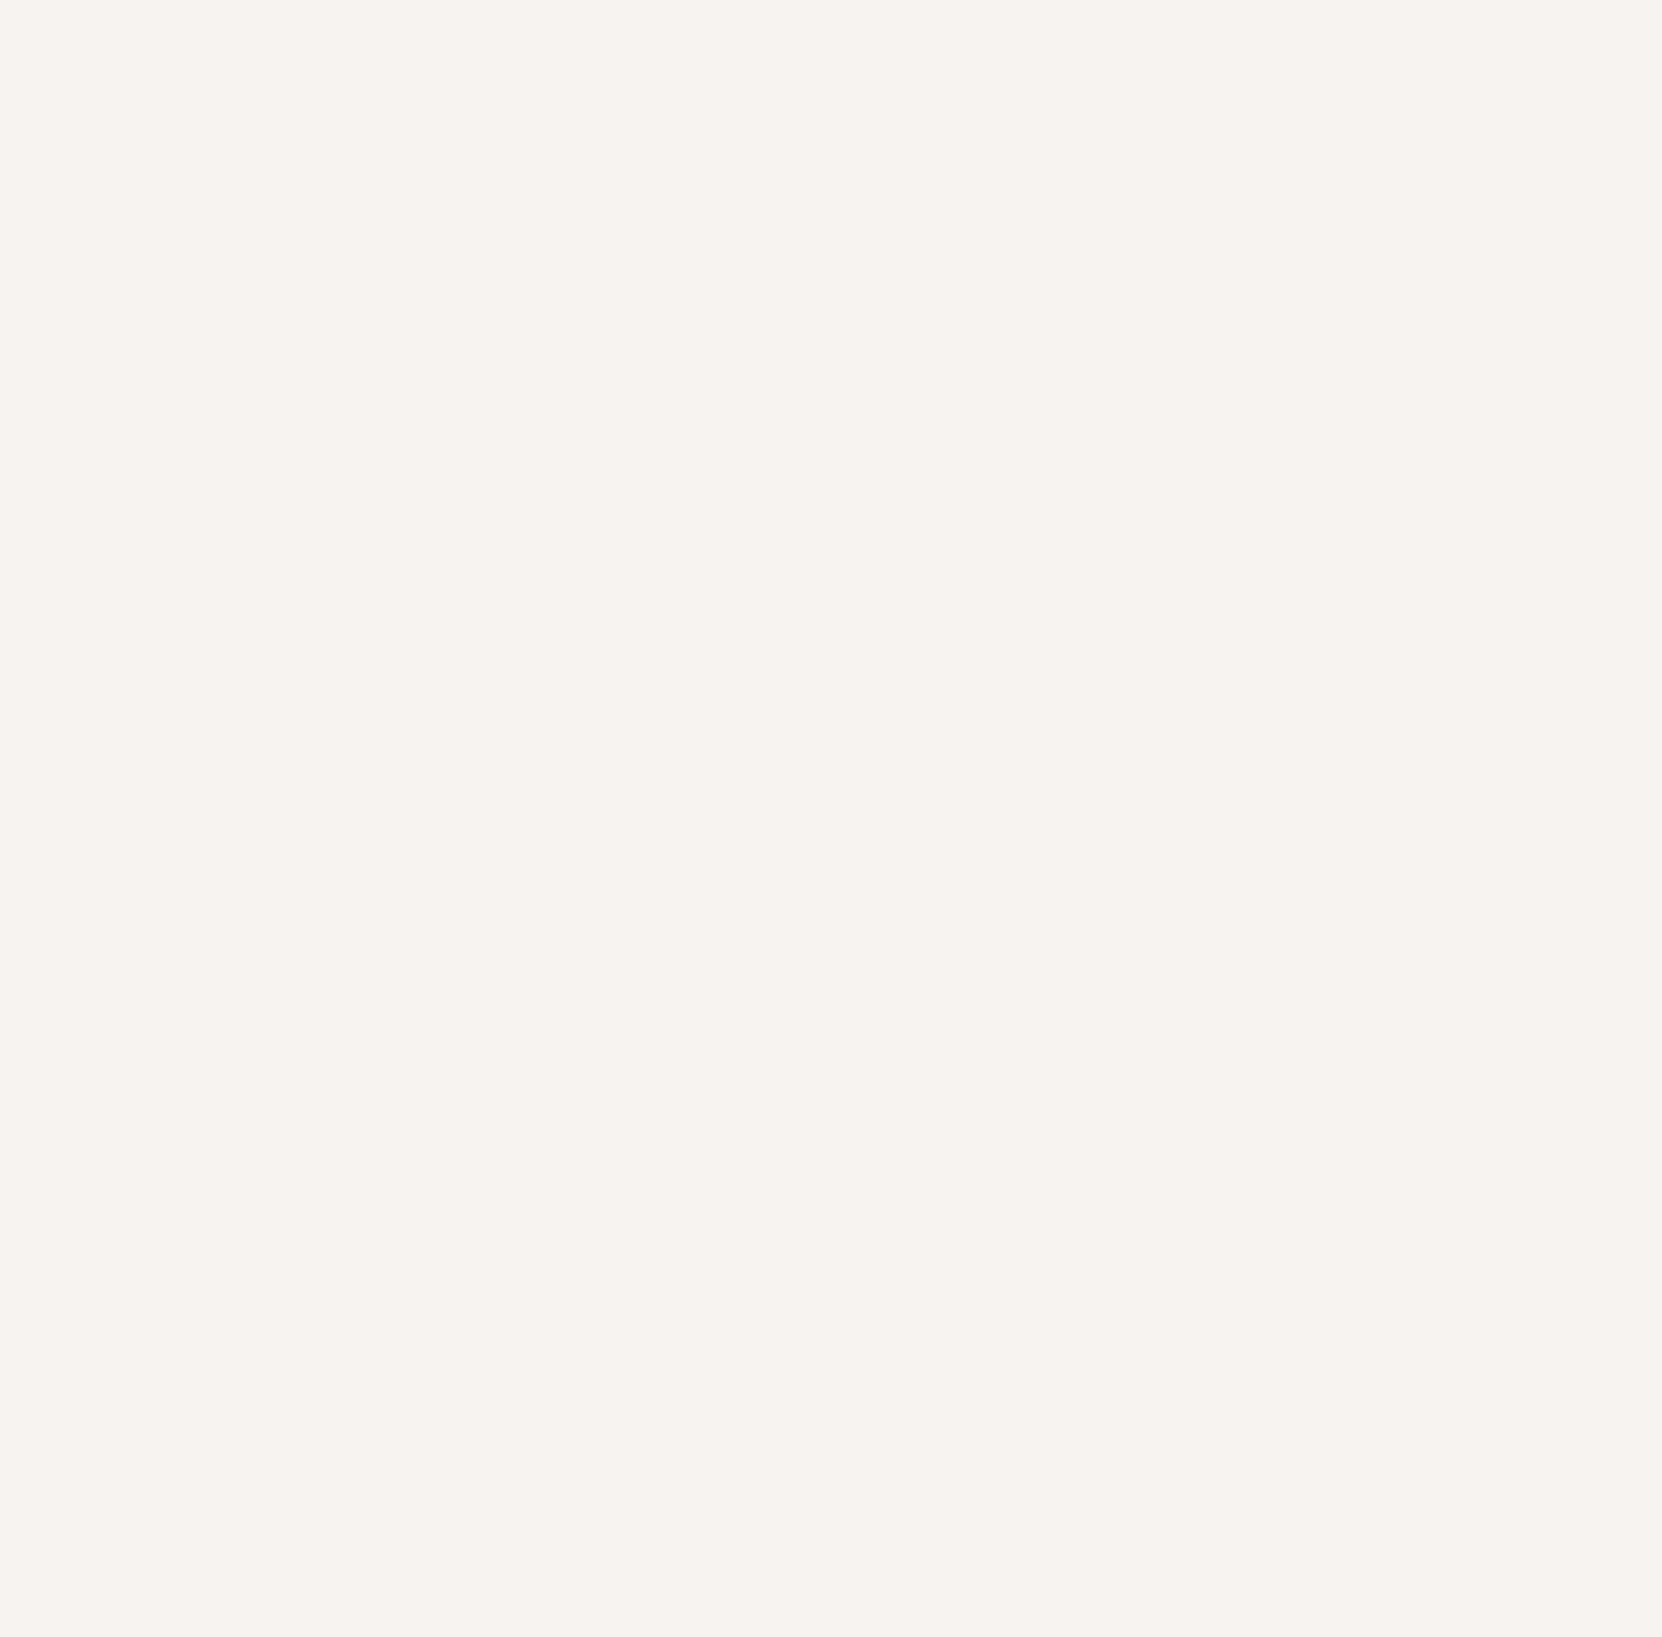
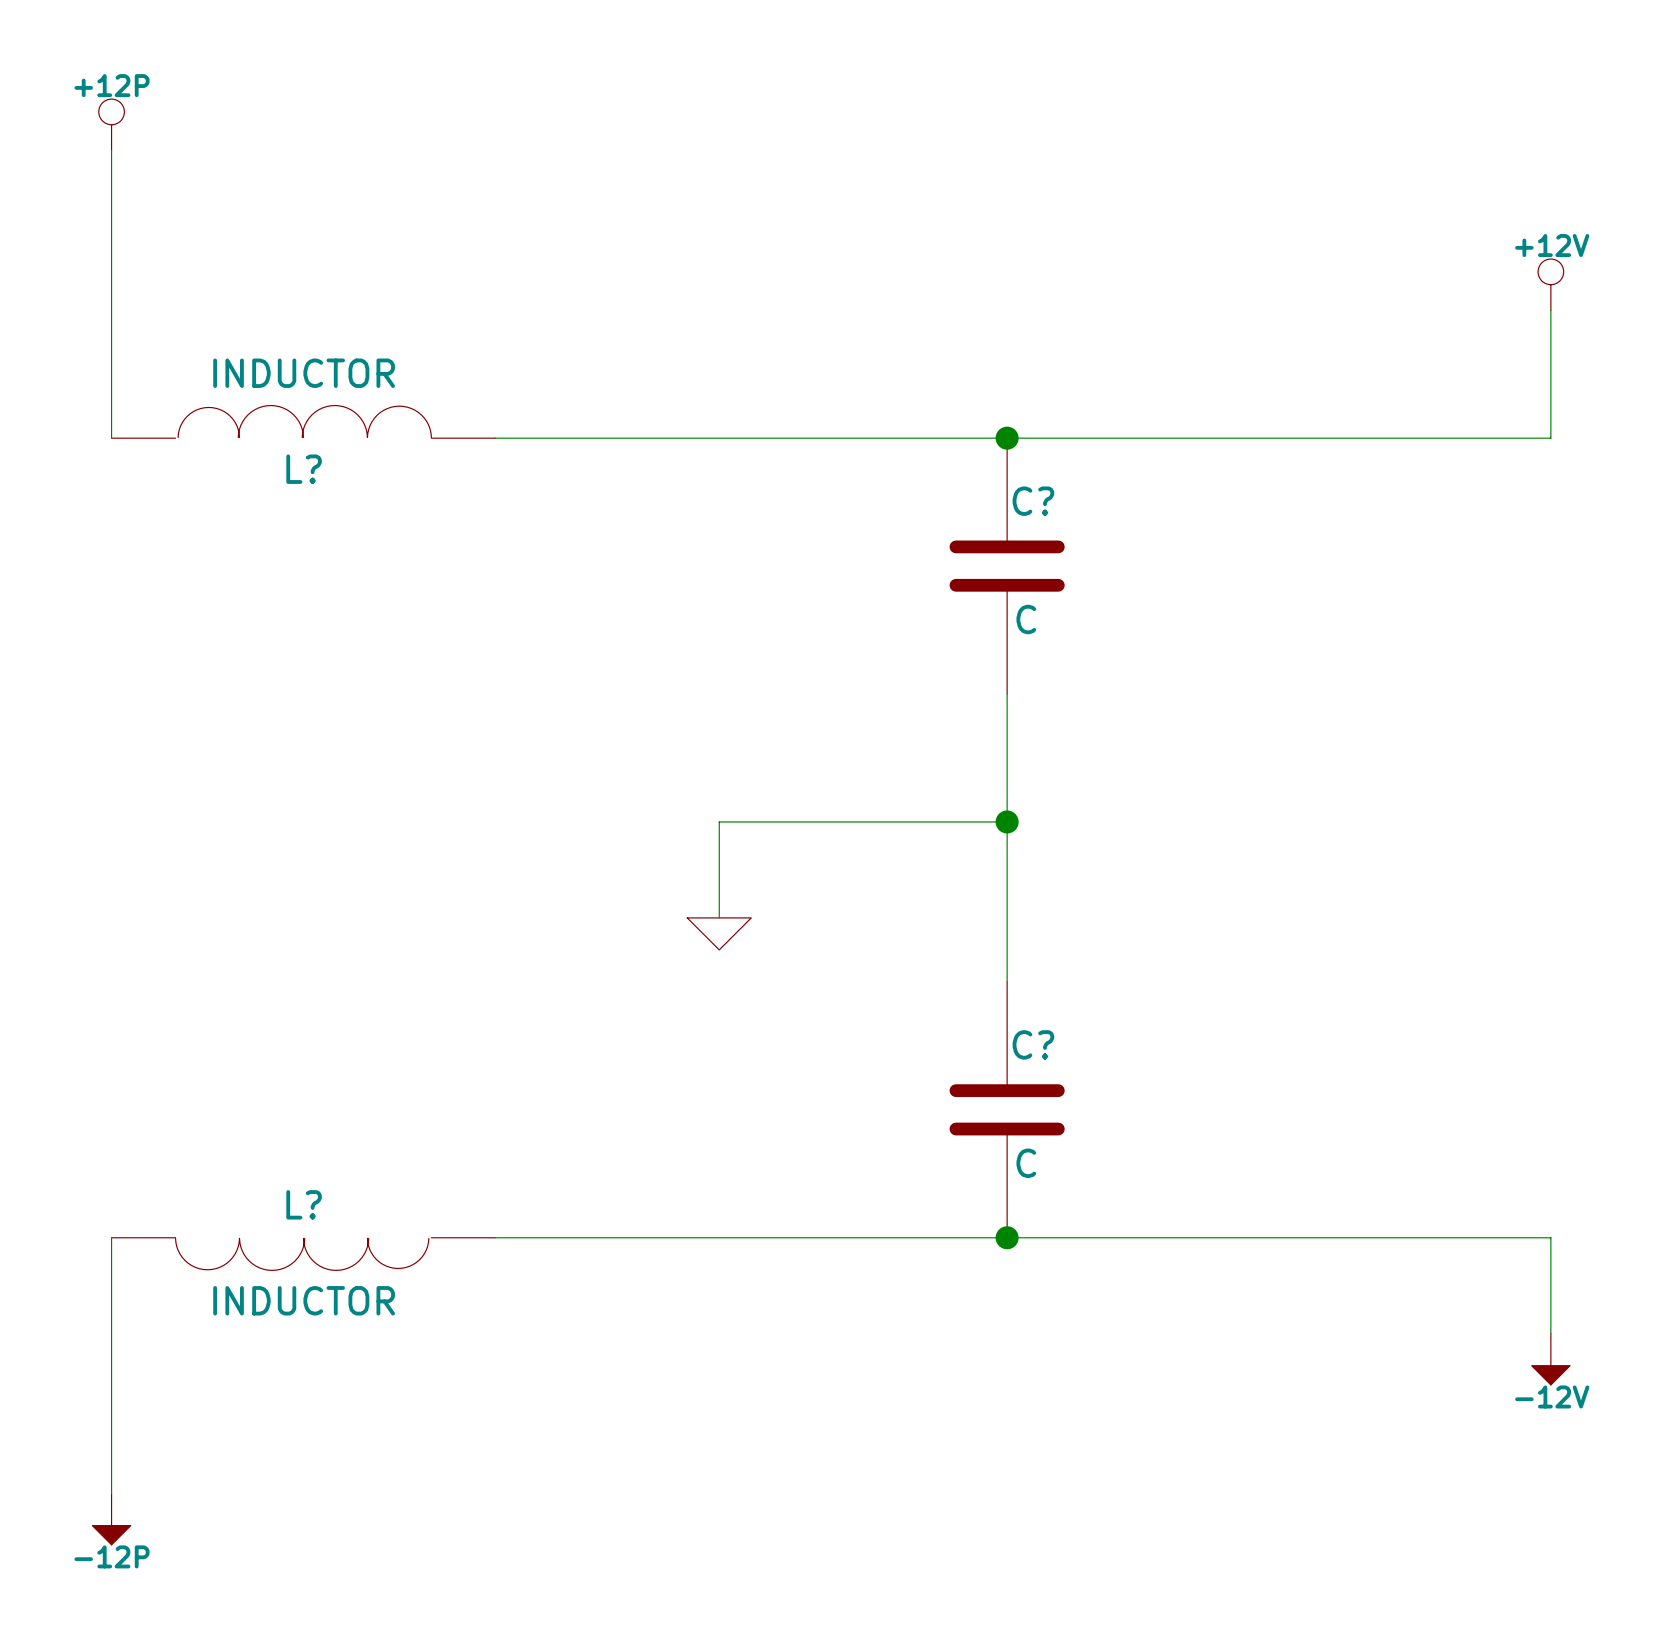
power symbol: none -> +12P (111, 124)
wire: none -> (111, 150) (111, 438)
power symbol: none -> +12V (1550, 284)
wire: none -> (1550, 310) (1550, 438) (495, 438)
L?: none -> INDUCTOR (303, 421)
junction: none -> (1007, 438)
C?: none -> C (1007, 566)
wire: none -> (1007, 694) (1007, 981)
wire: none -> (1007, 821) (719, 821) (719, 917)
junction: none -> (1007, 821)
power symbol: none -> (719, 933)
C?: none -> C (1007, 1109)
wire: none -> (111, 1237) (111, 1493)
wire: none -> (495, 1237) (1550, 1237) (1550, 1333)
junction: none -> (1007, 1237)
L?: none -> INDUCTOR (303, 1254)
power symbol: none -> -12V (1550, 1359)
power symbol: none -> -12P (111, 1519)

